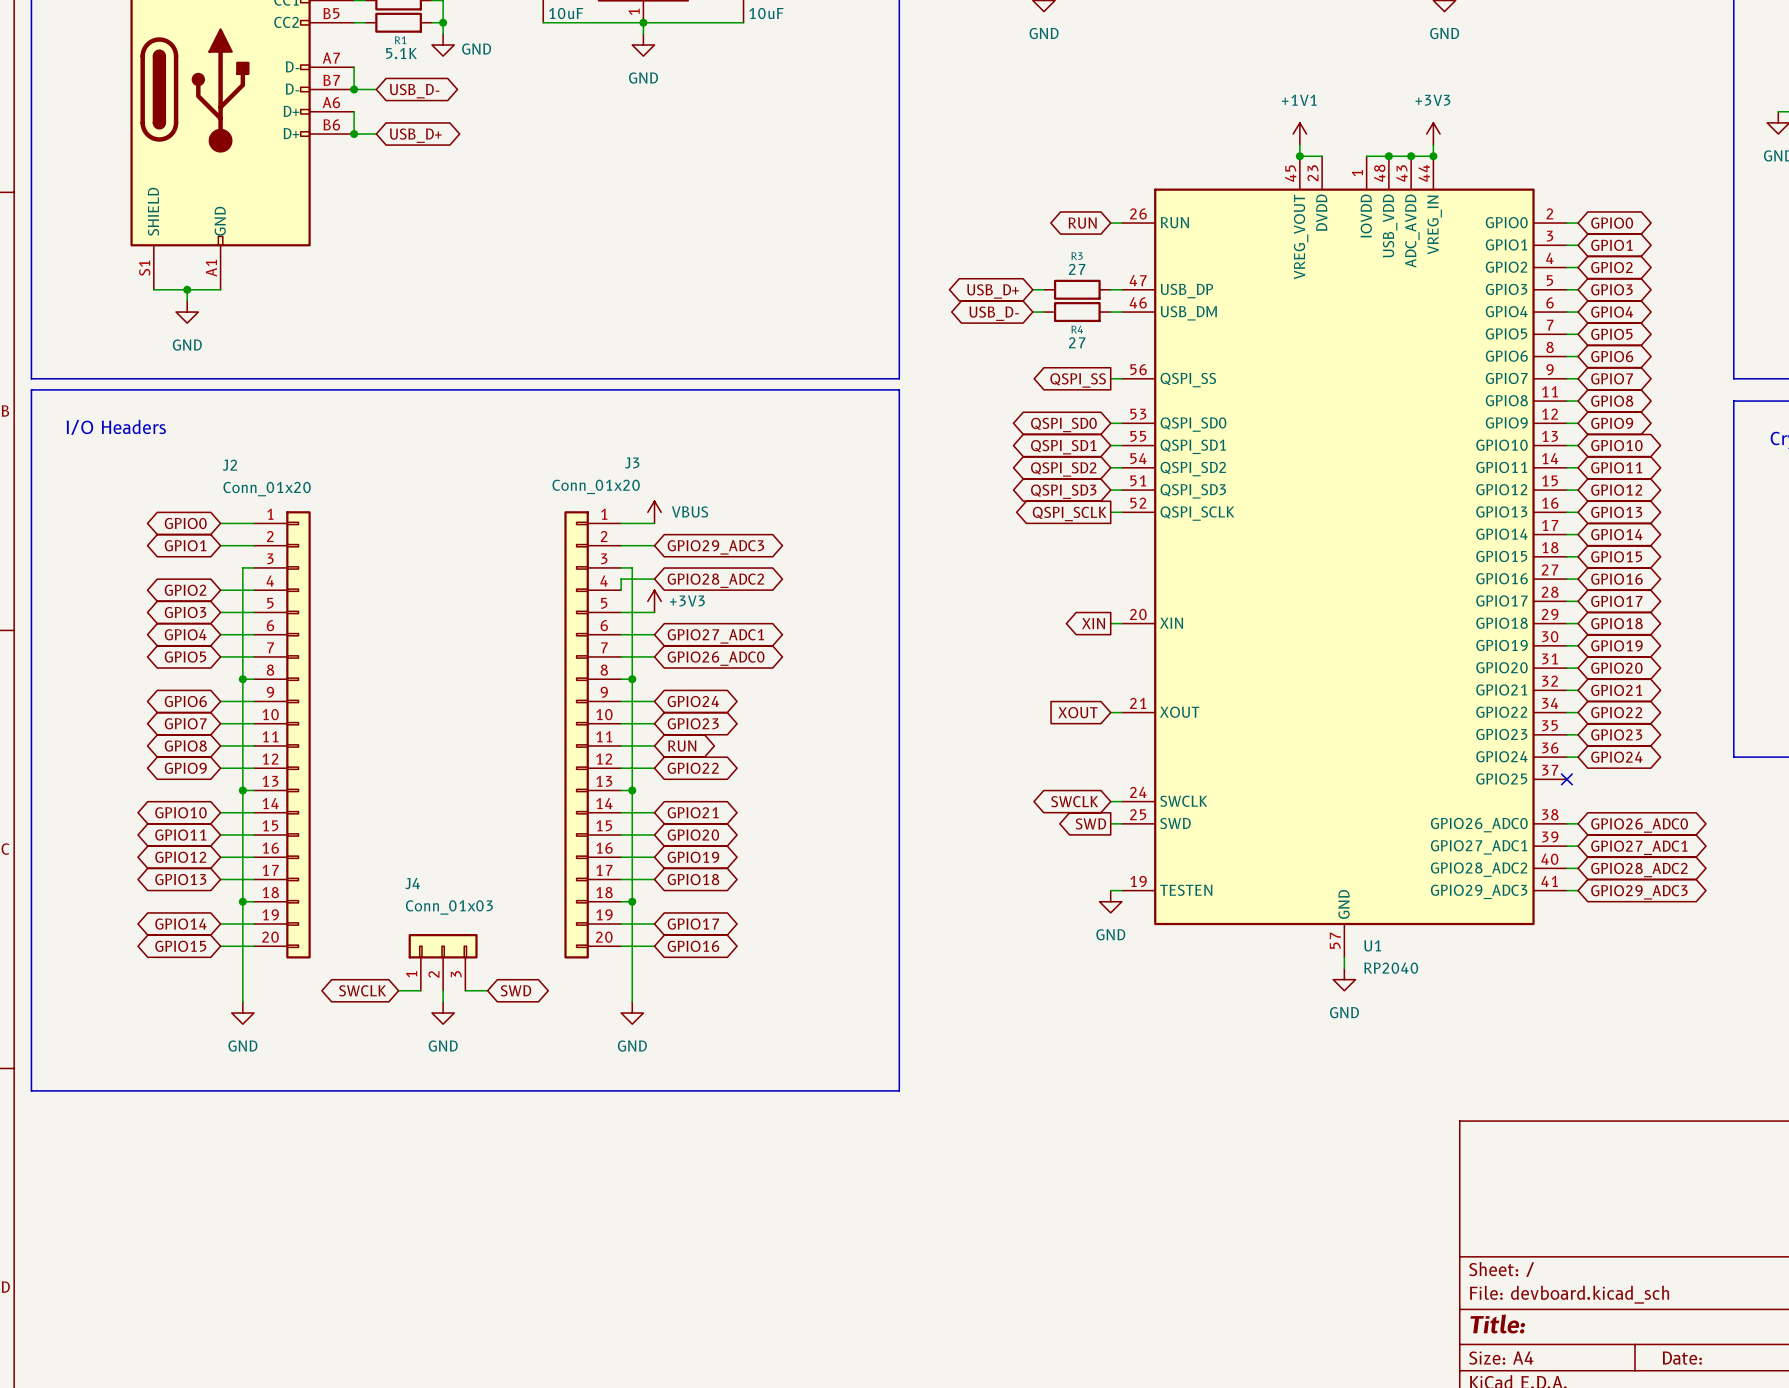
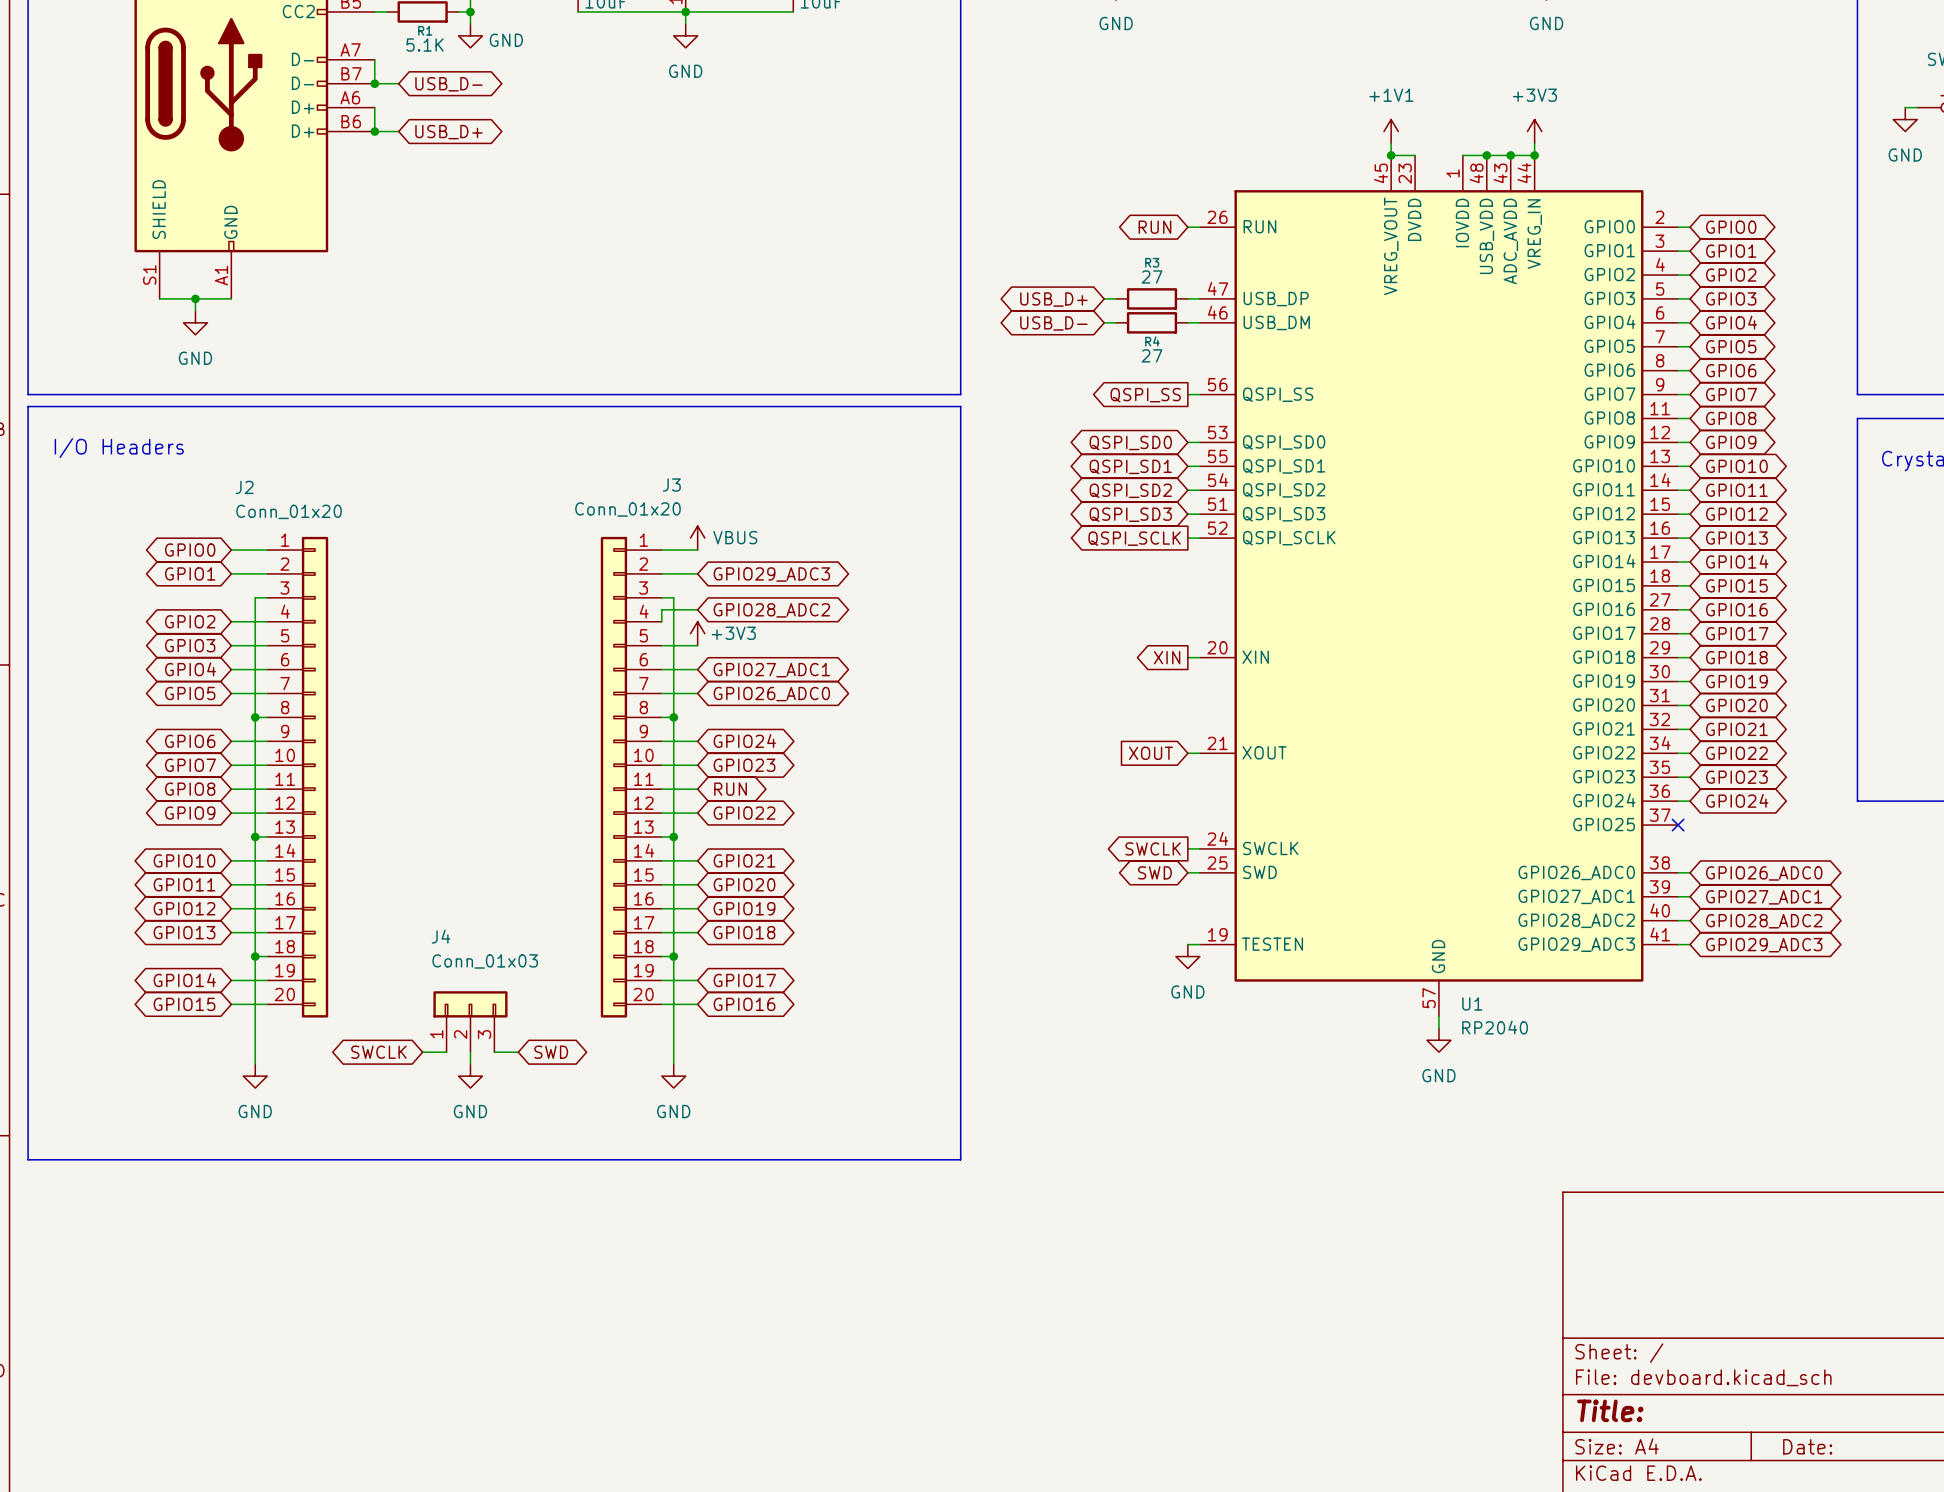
global label shape: bidirectional (1074, 801) -> output (1153, 848)
global label shape: output (1090, 823) -> bidirectional (1154, 872)

